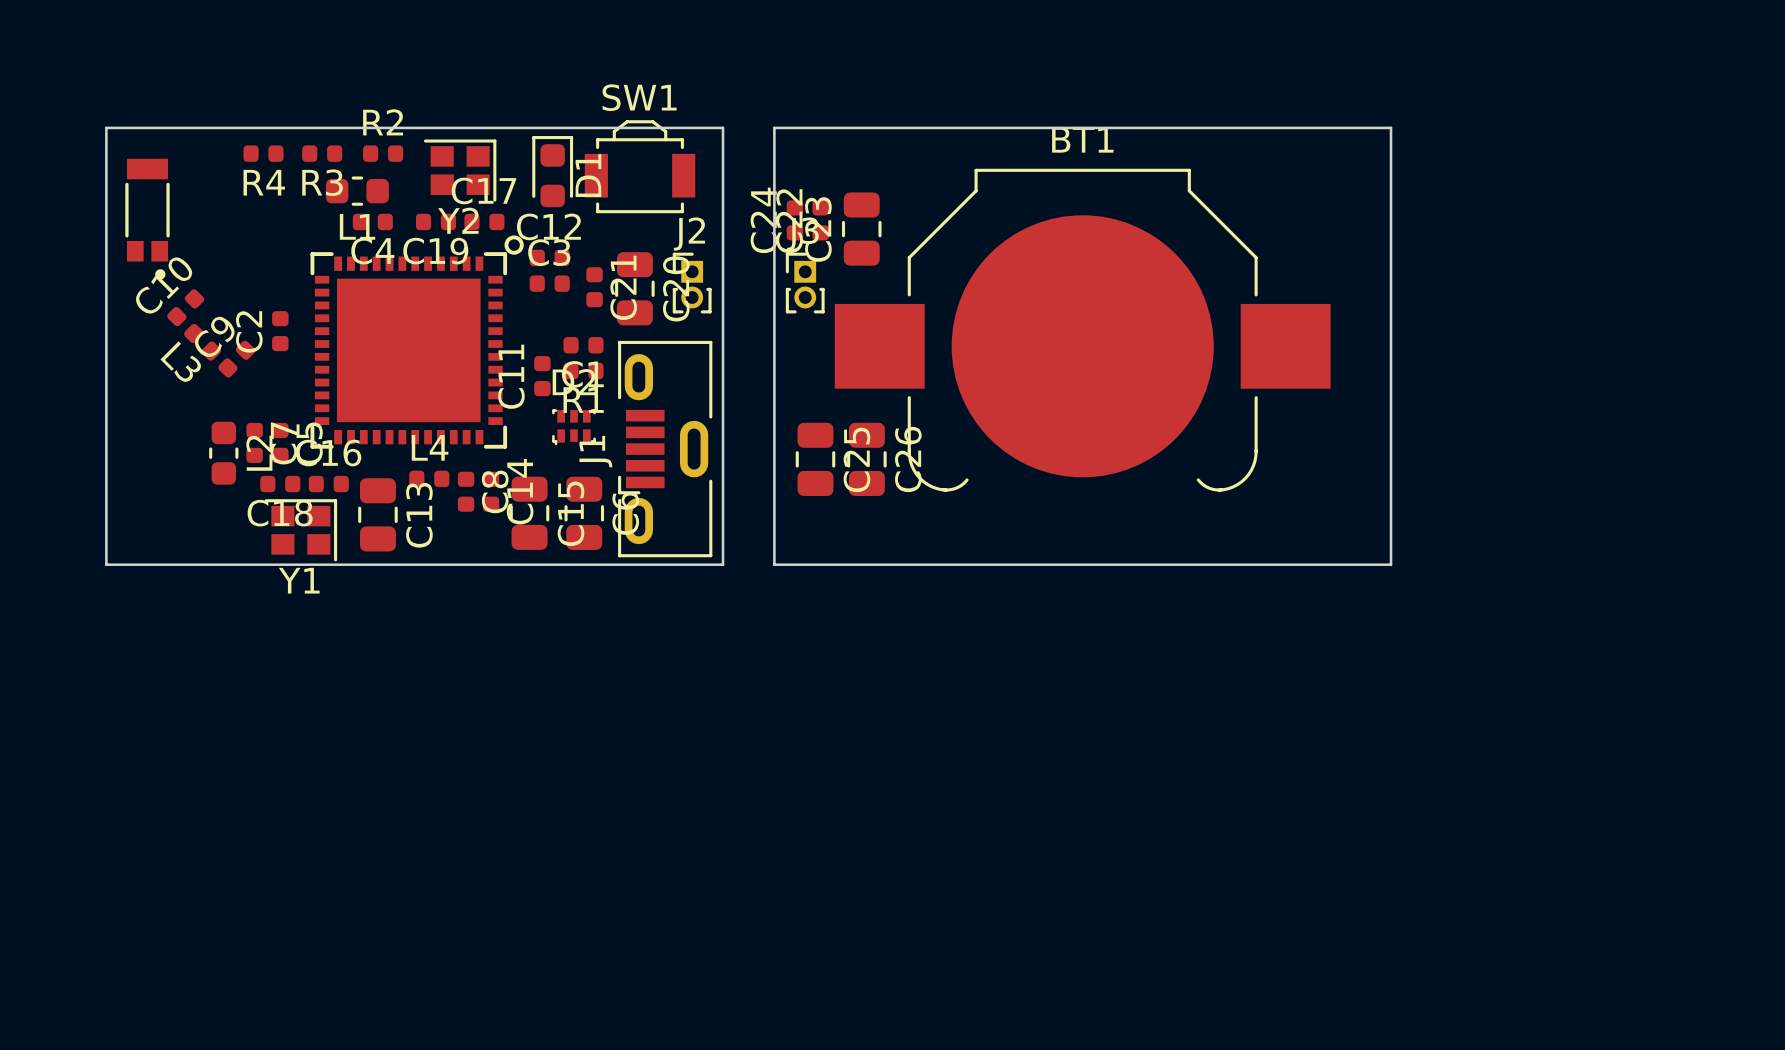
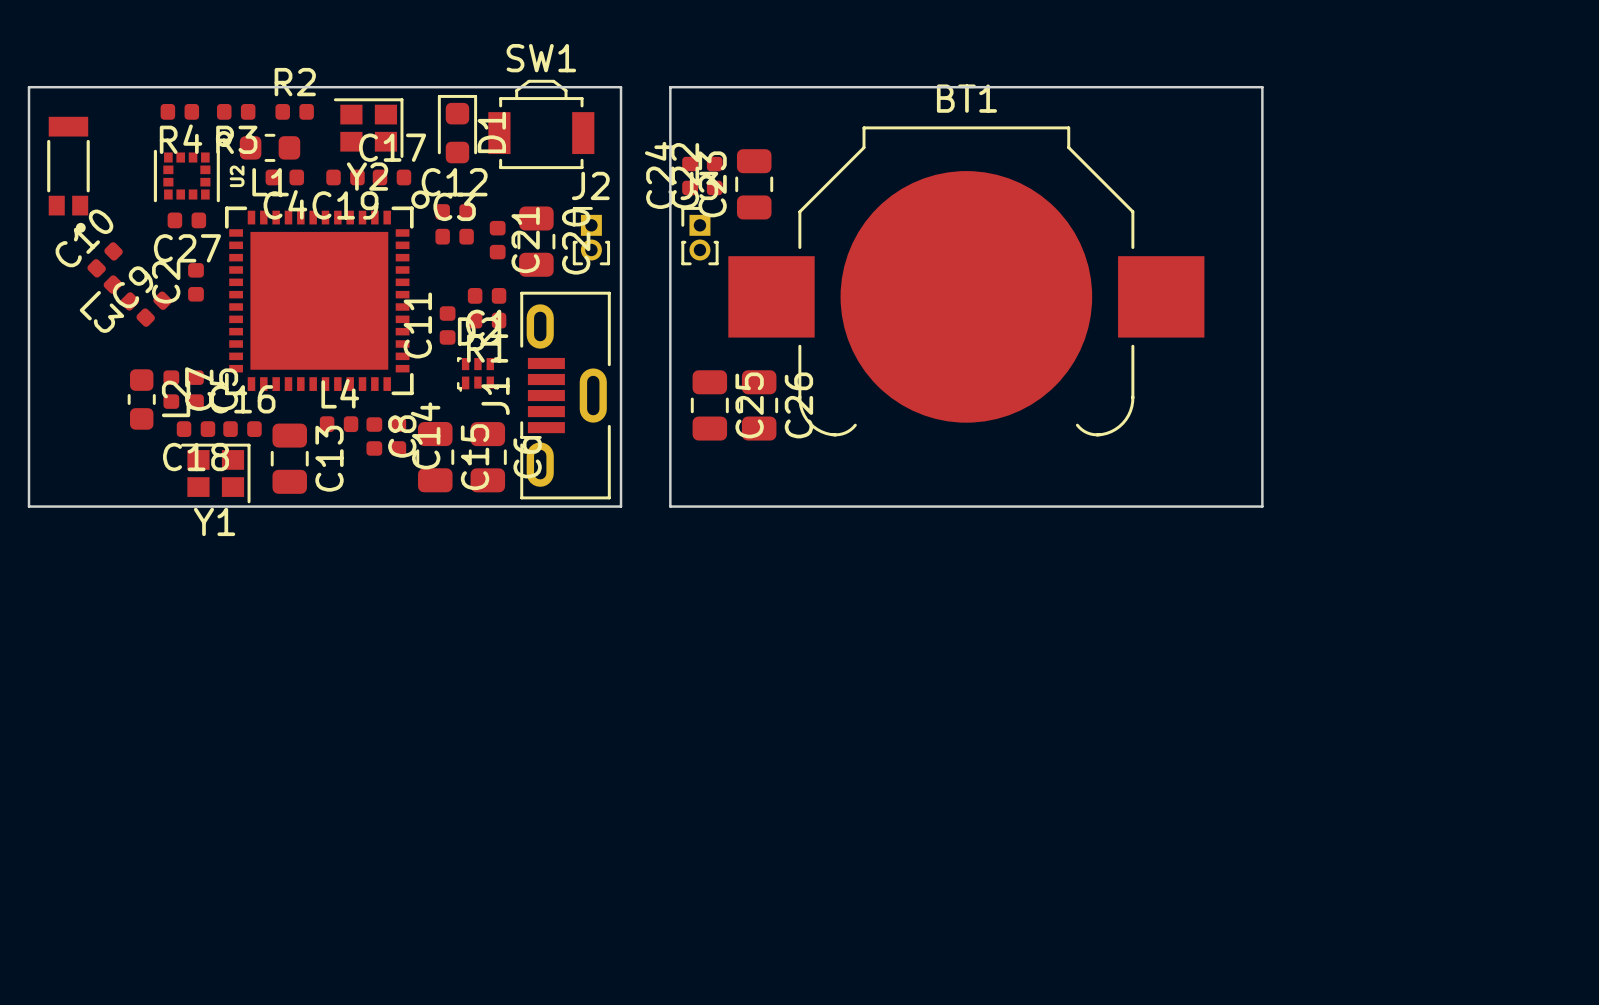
U2: none -> (192, 166)
C27: none -> (186, 220)

